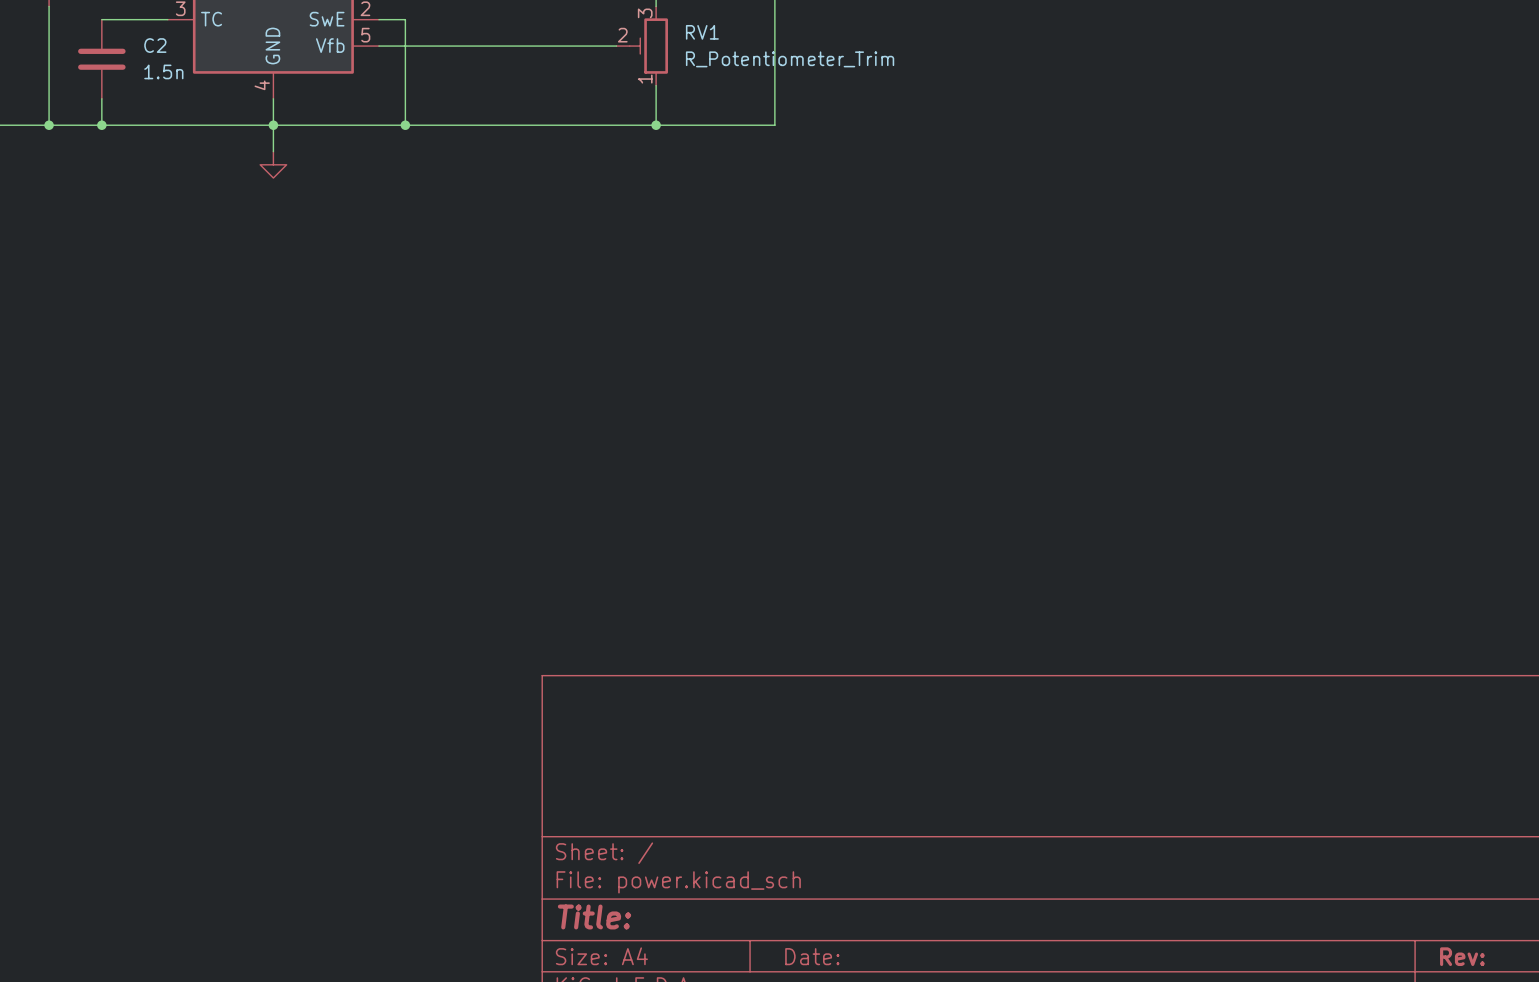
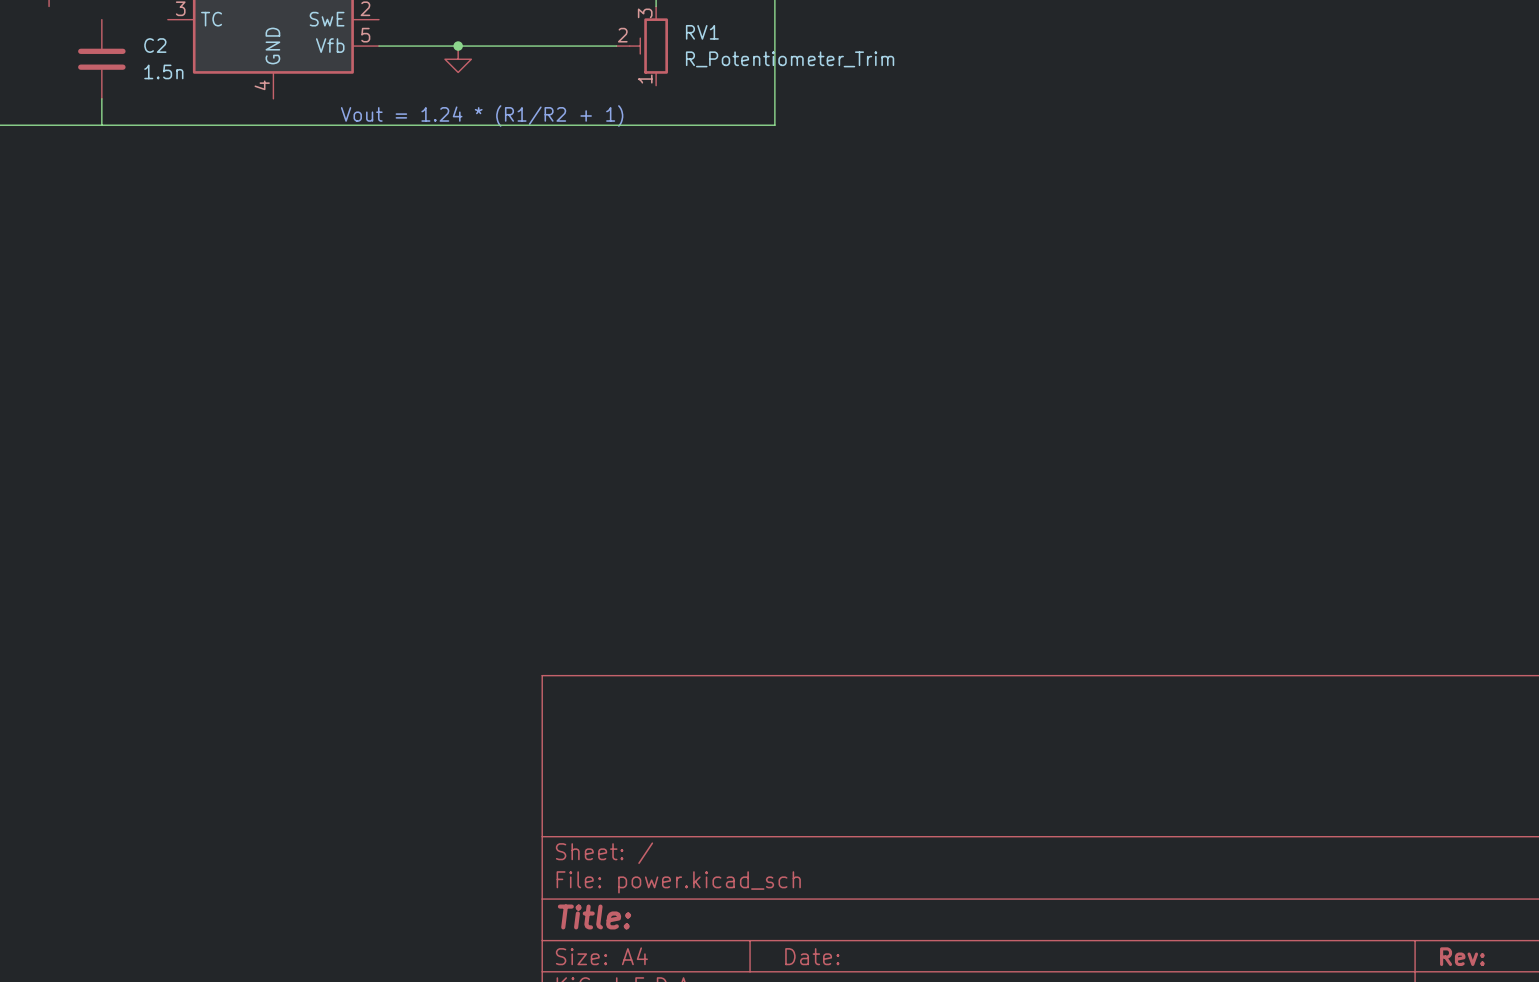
wire: (49, 6) (49, 125) -> none
wire: (101, 19) (167, 19) -> none
wire: (378, 19) (405, 19) (405, 125) -> none
junction: none -> (458, 46)
power symbol: none -> (458, 59)
wire: (656, 85) (656, 125) -> none
wire: (273, 98) (273, 151) -> none
text: none -> Vout = 1.24 * (R1/R2 + 1) (482, 115)
junction: (49, 125) -> none
junction: (101, 125) -> none
junction: (273, 125) -> none
junction: (405, 125) -> none
junction: (656, 125) -> none
power symbol: (273, 164) -> none

